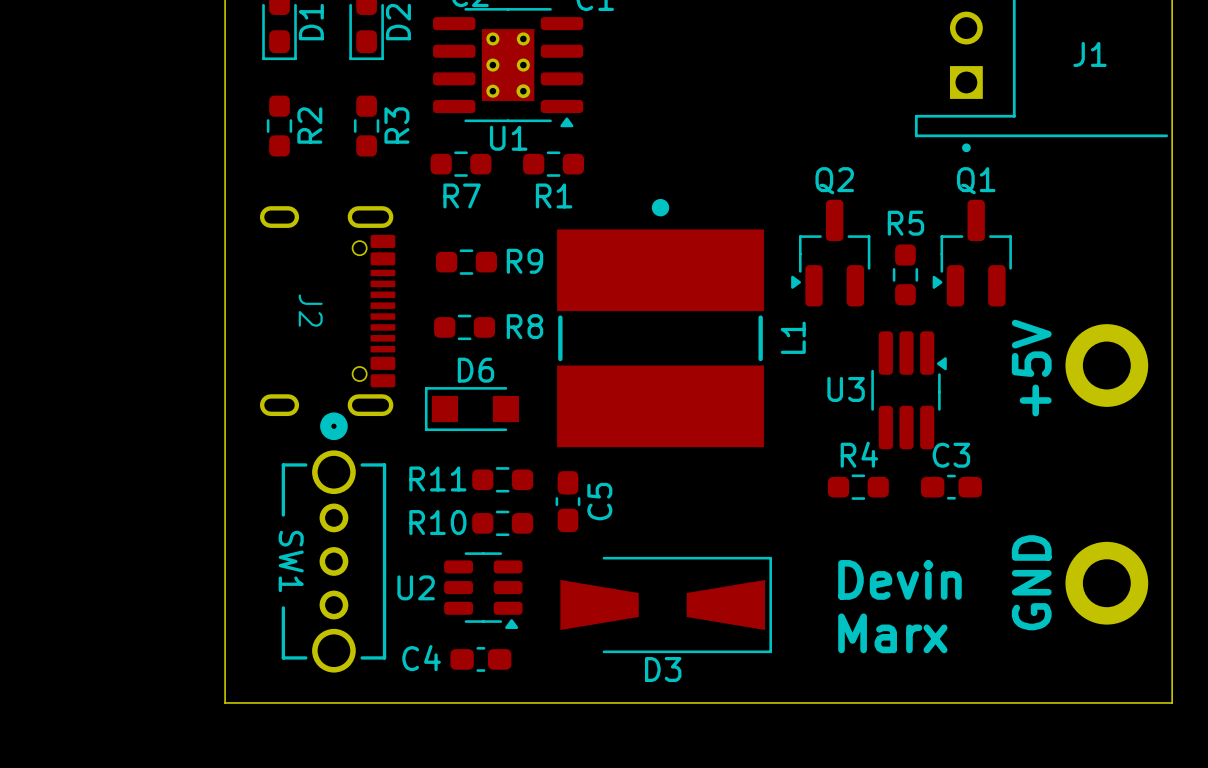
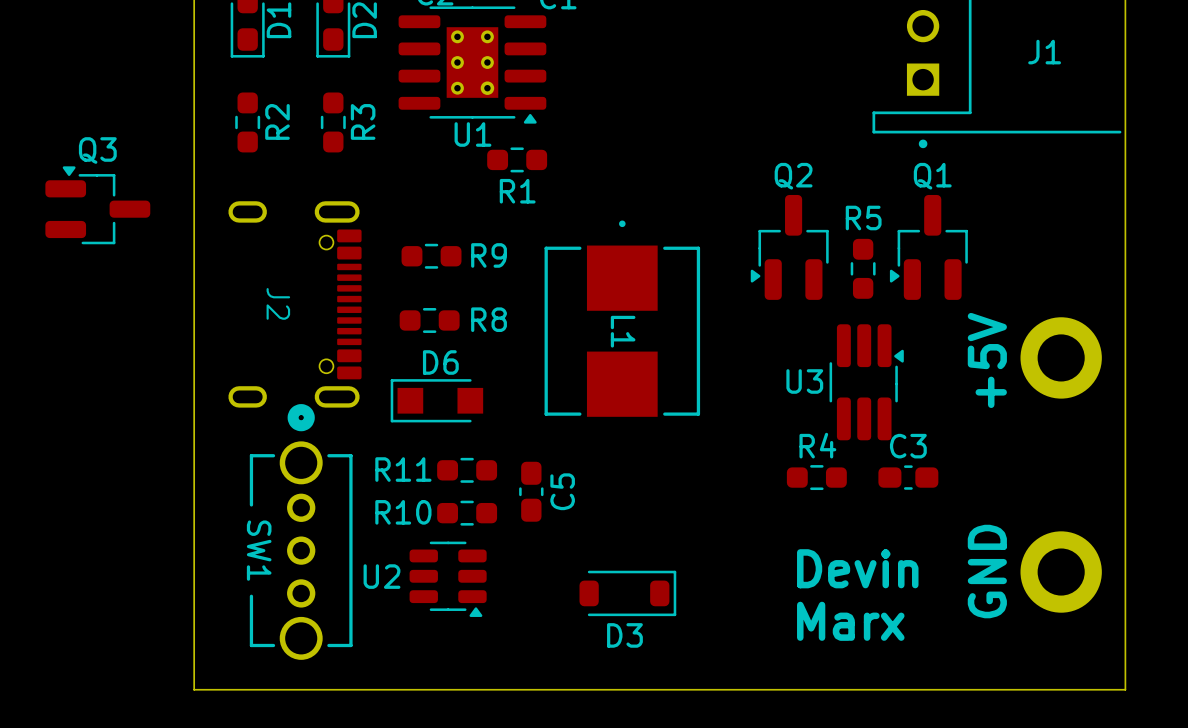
R7: (461, 164) -> none
L1 footprint: [557, 198, 764, 448] -> [544, 220, 701, 417]
Q3: none -> (97, 205)
L1 name position: L1 (793, 337) -> L1 (623, 331)
D3 footprint: [560, 556, 772, 654] -> [579, 570, 677, 617]
C4: (480, 659) -> none

